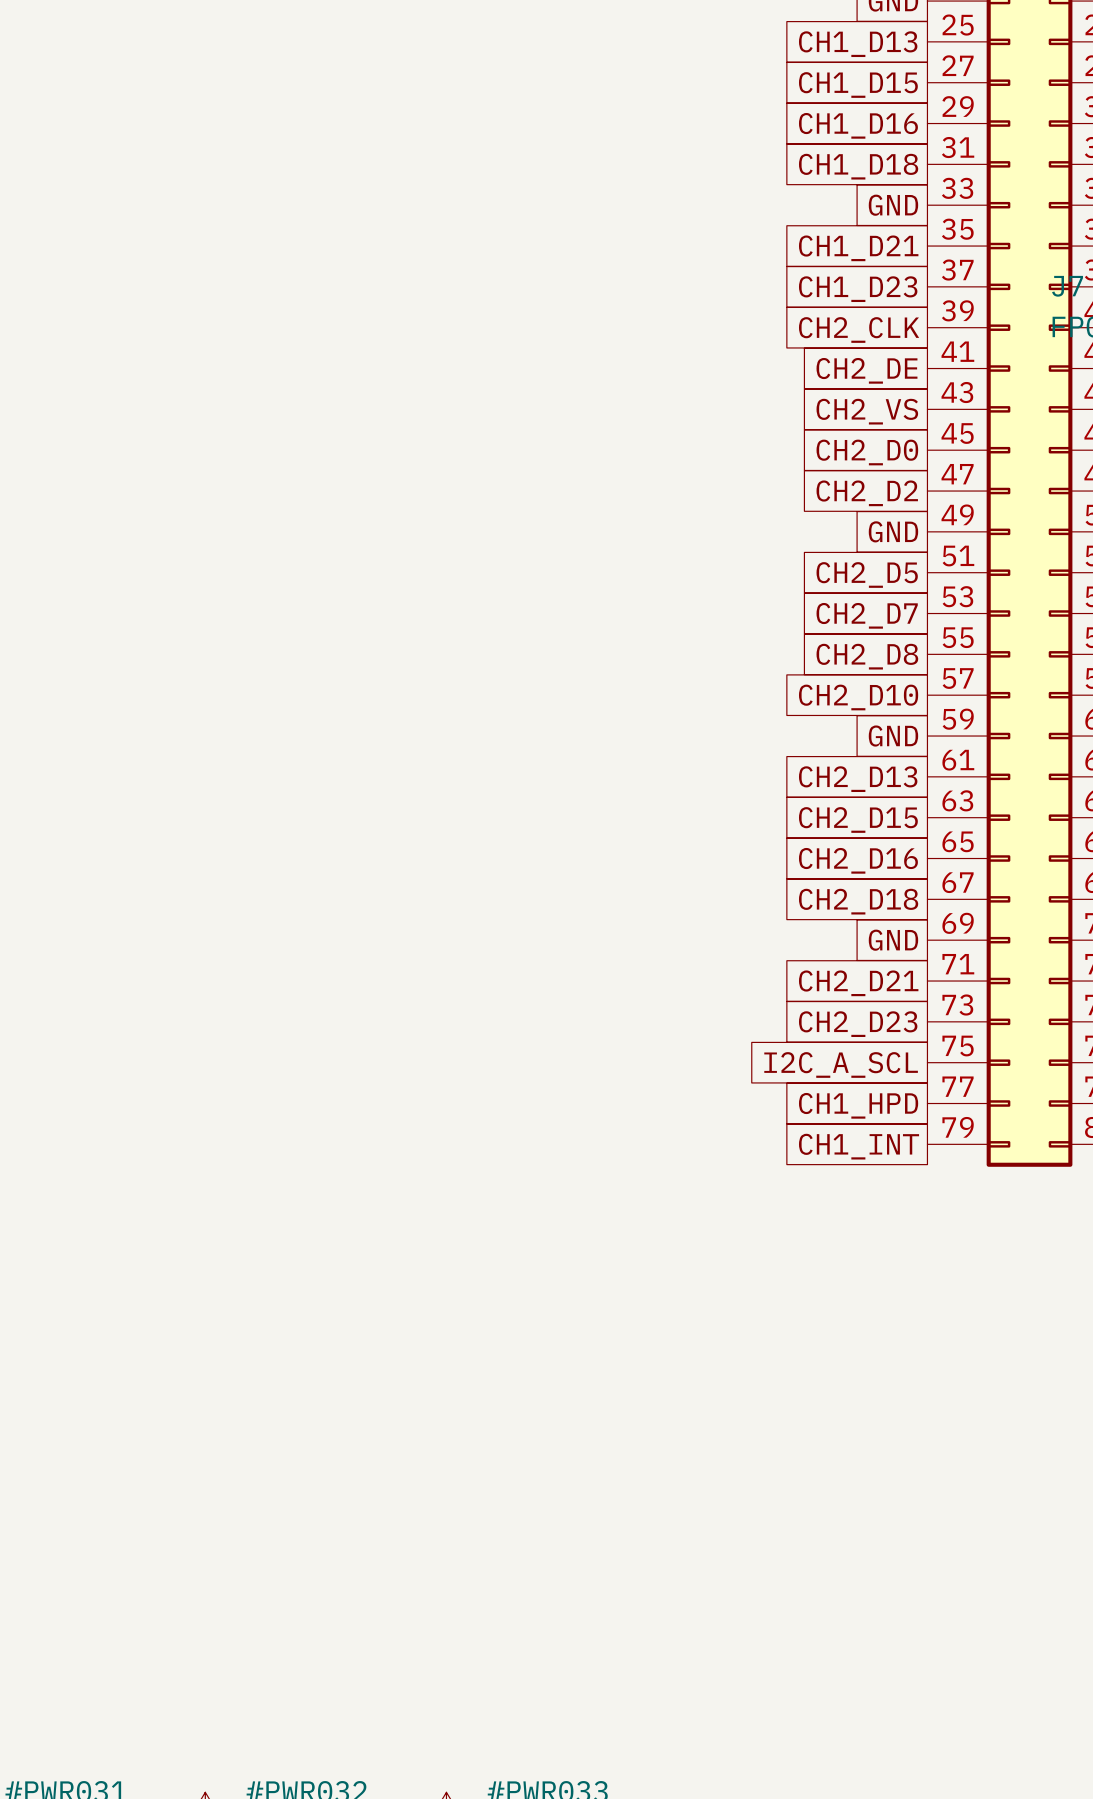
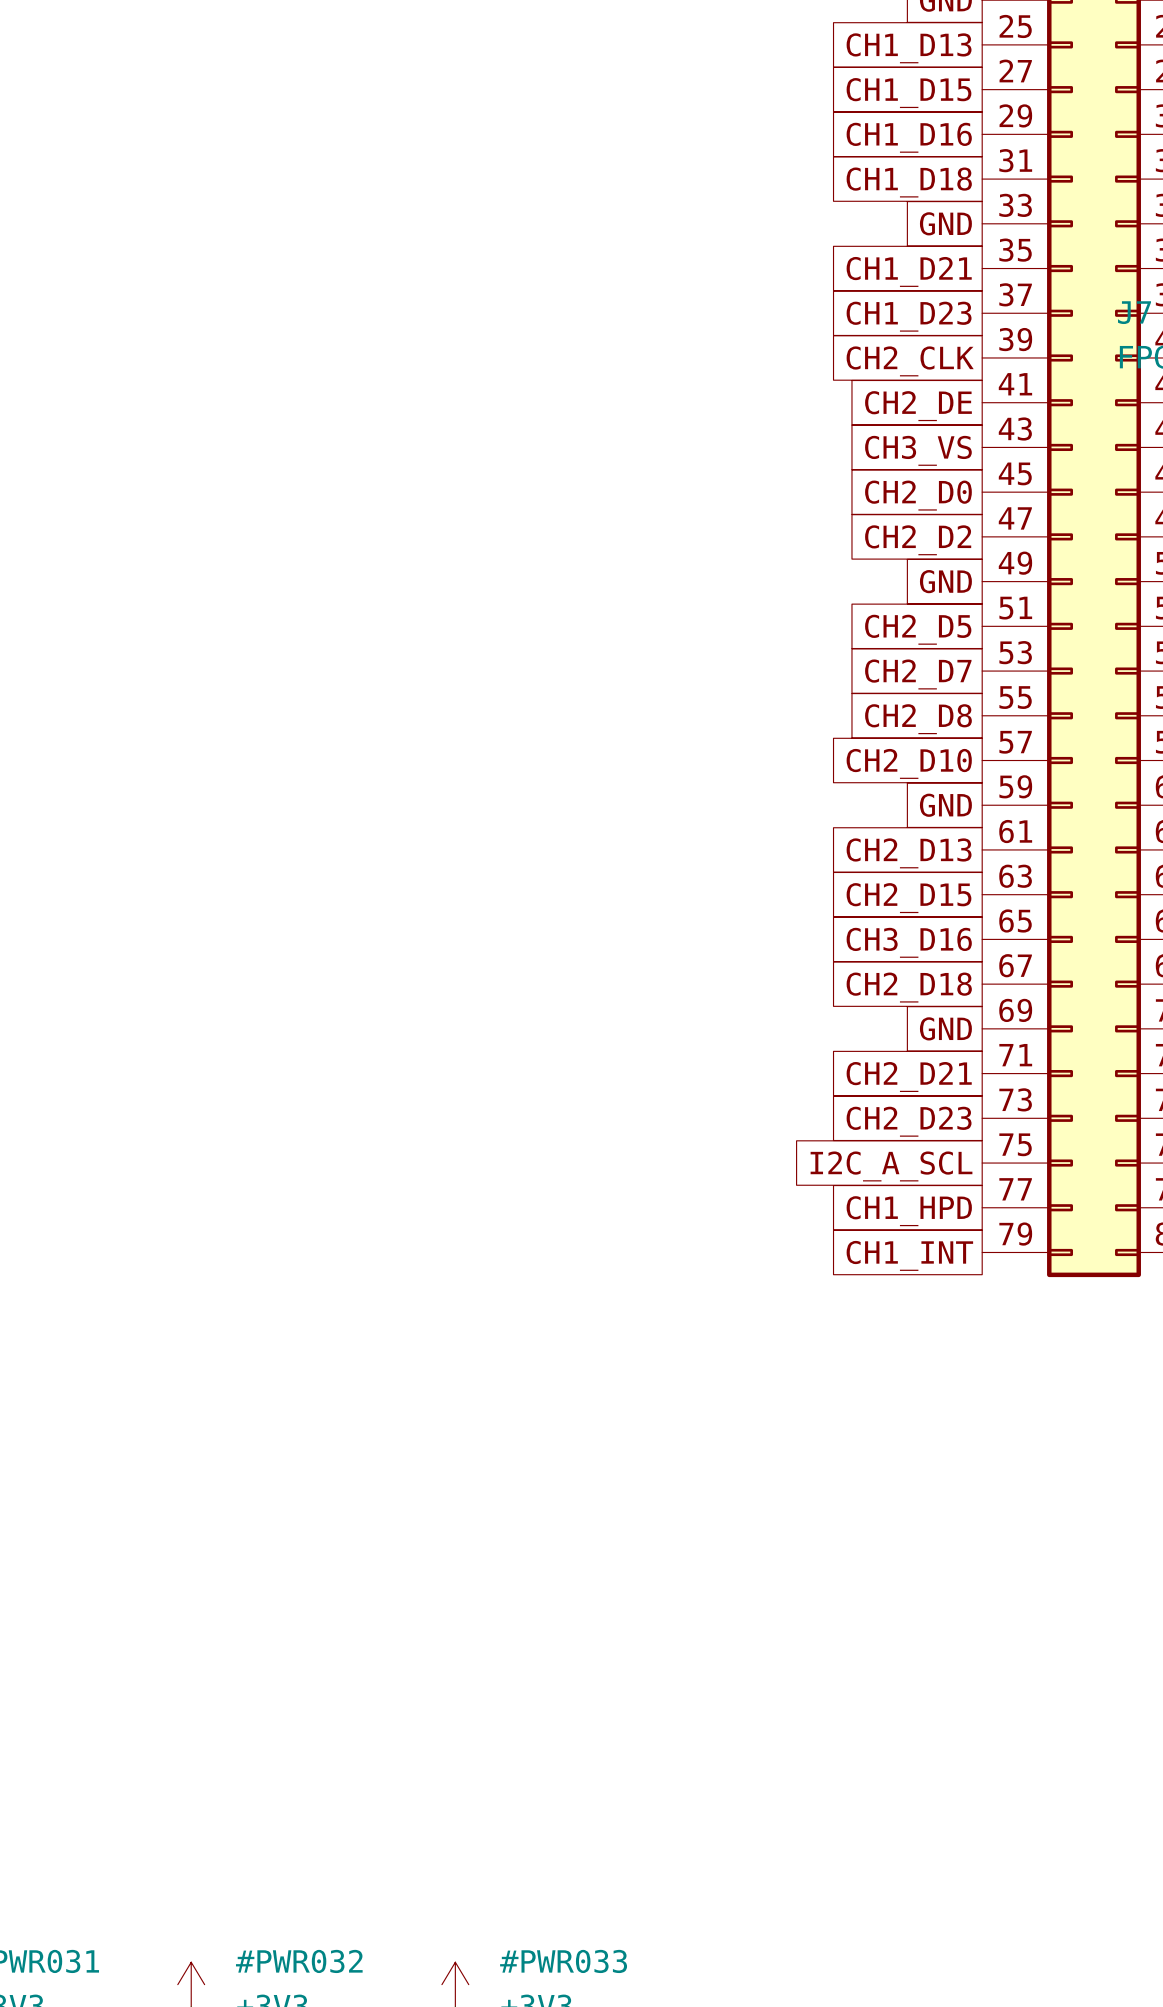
global label: CH2_VS (867, 411) -> CH3_VS (918, 450)
global label: CH2_D16 (858, 860) -> CH3_D16 (909, 942)

